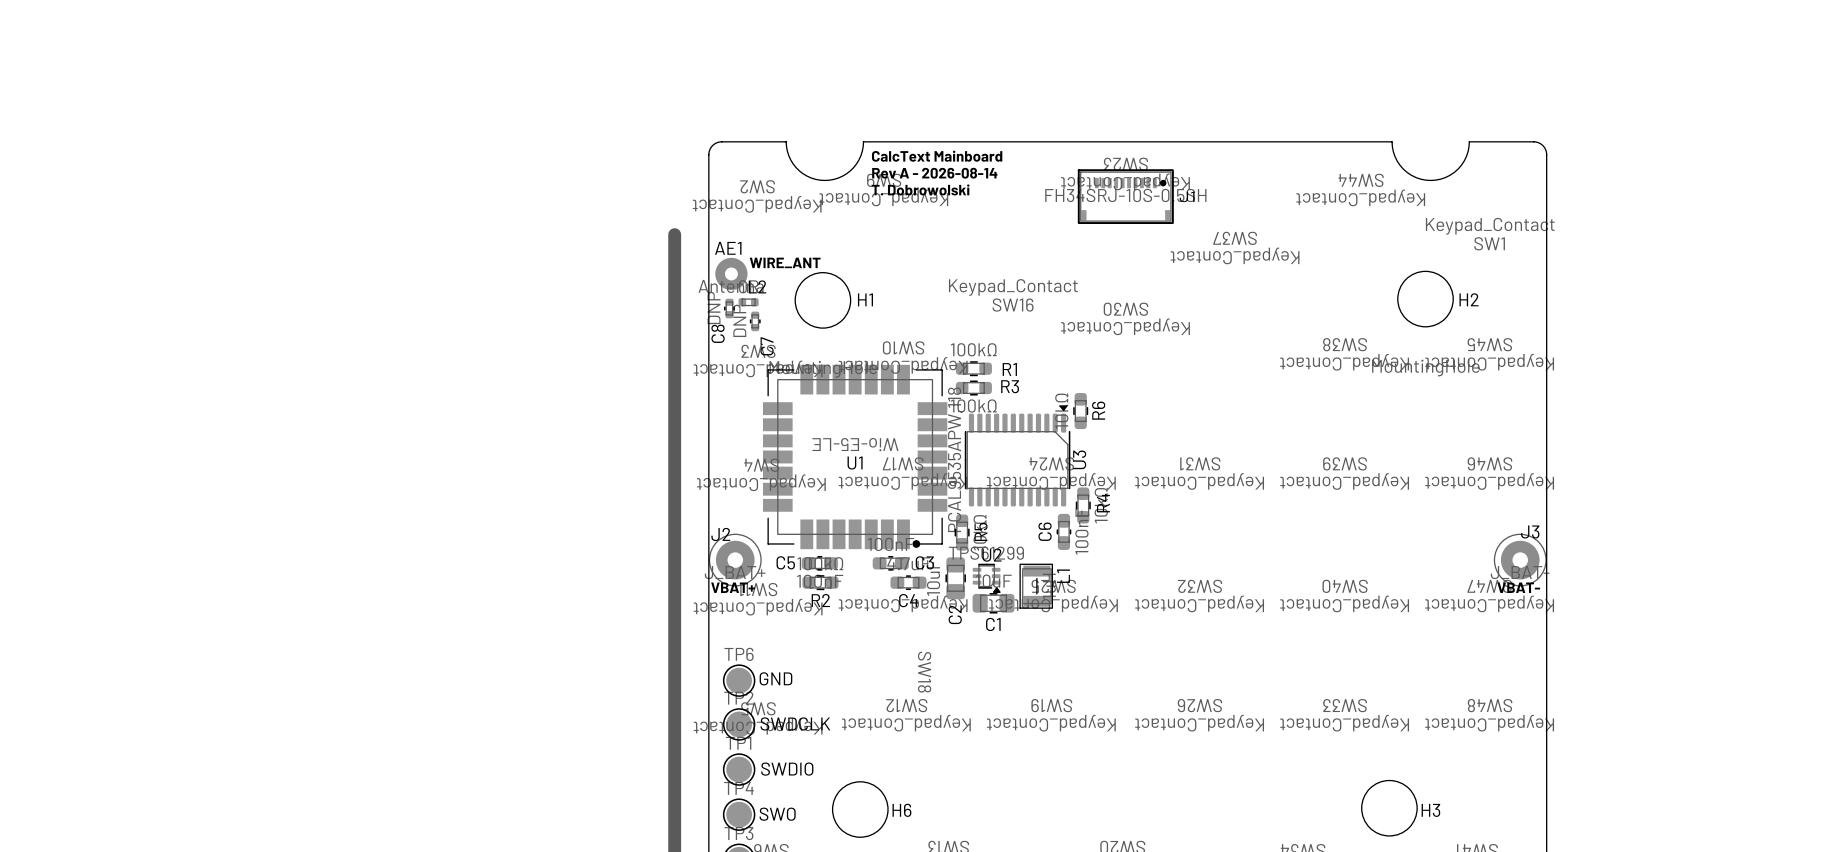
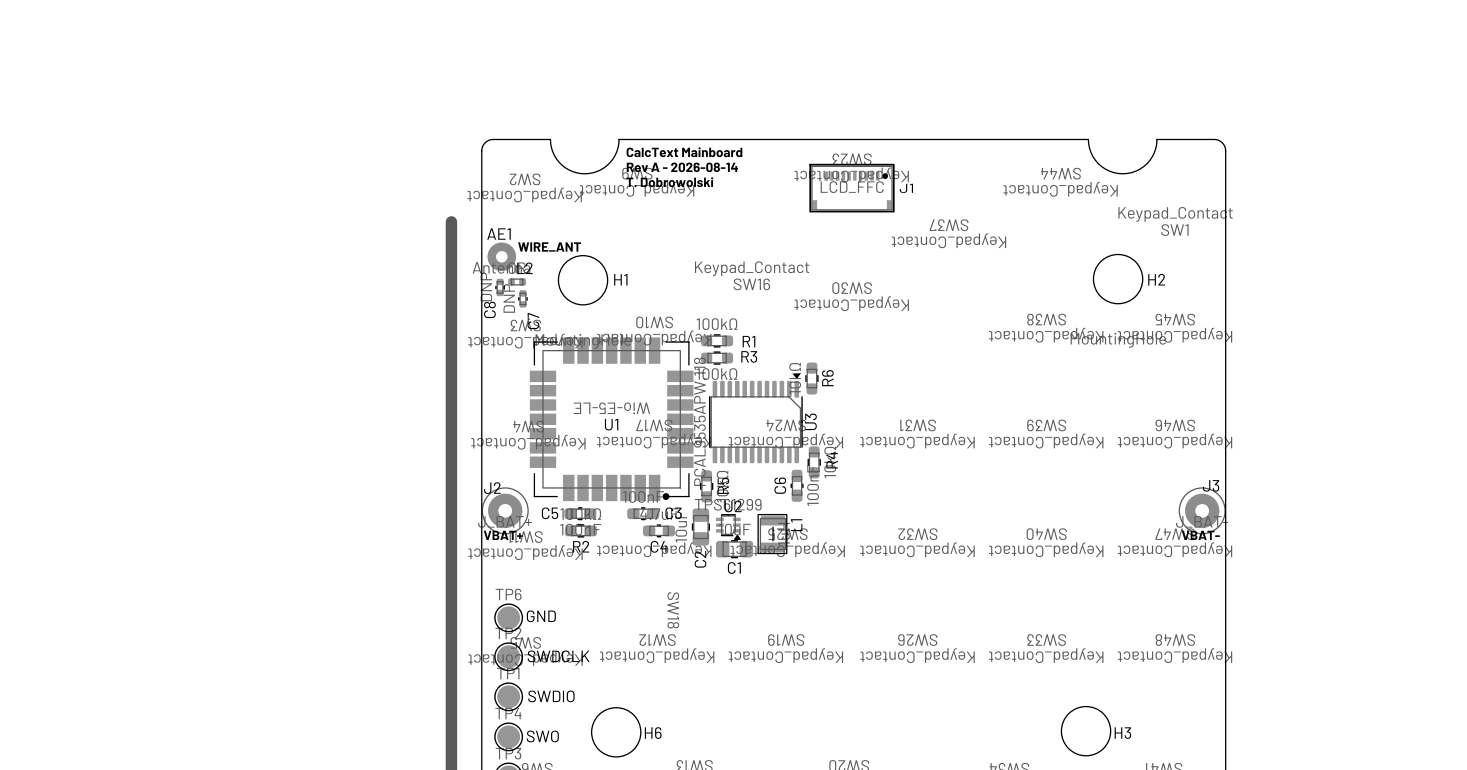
J1 value: FH34SRJ-10S-0.5SH (1125, 195) -> LCD_FFC (852, 187)

